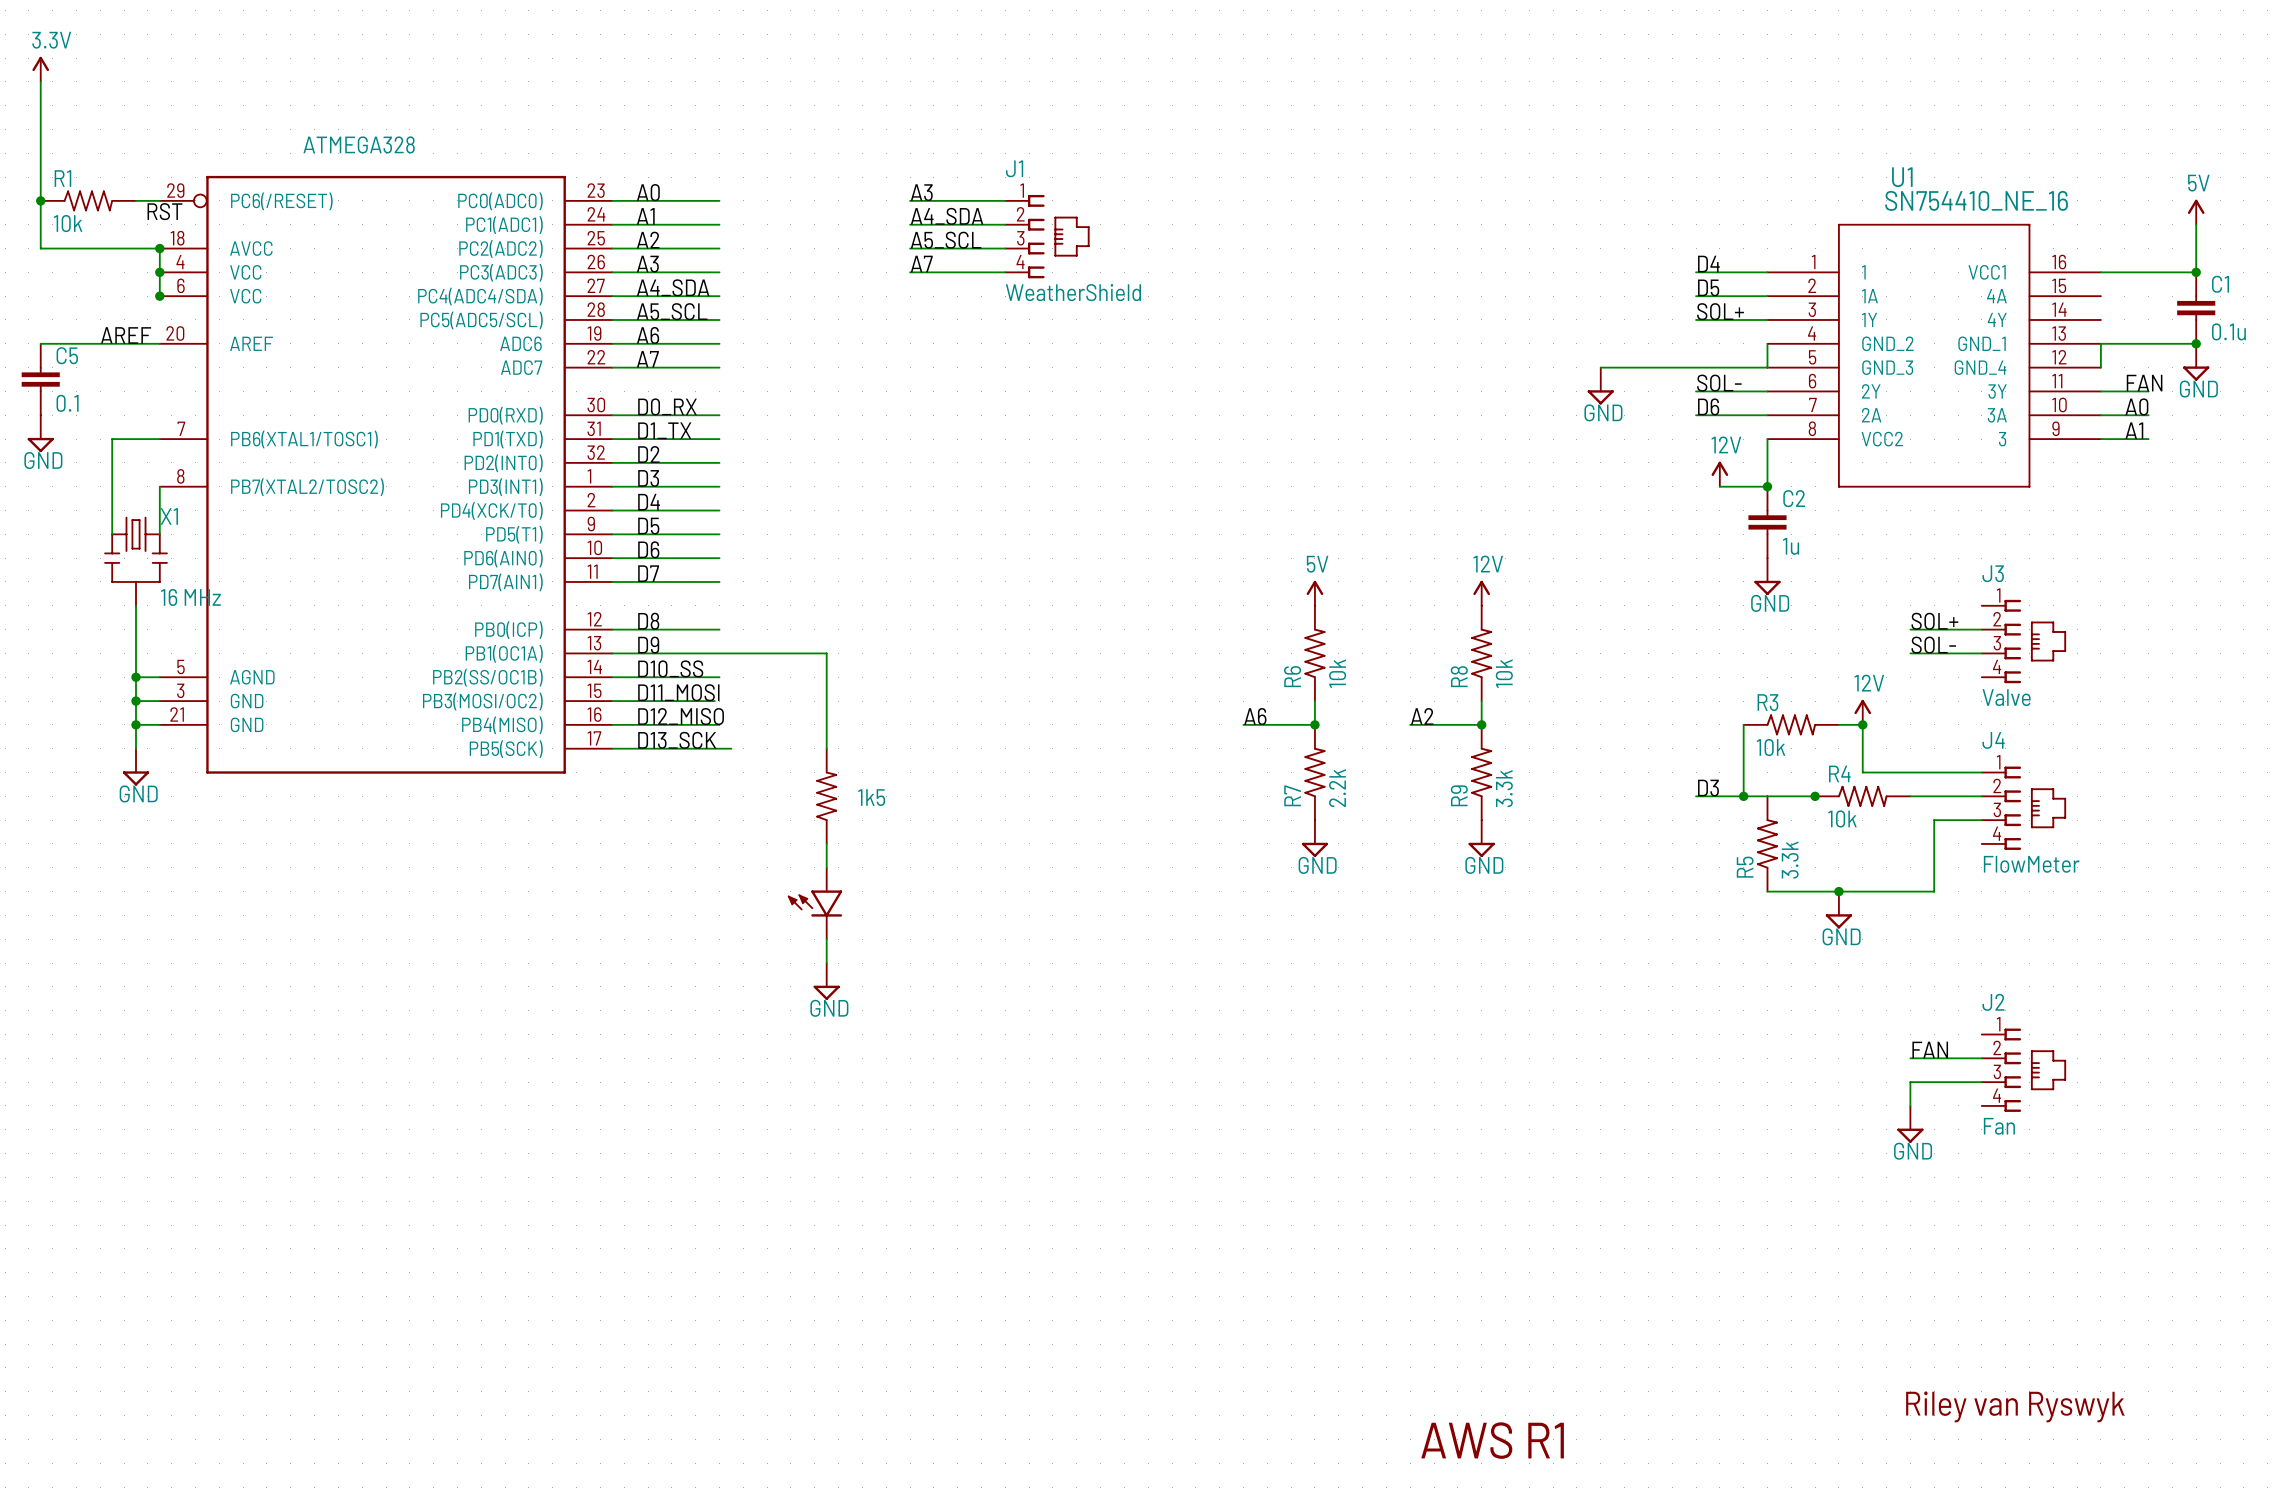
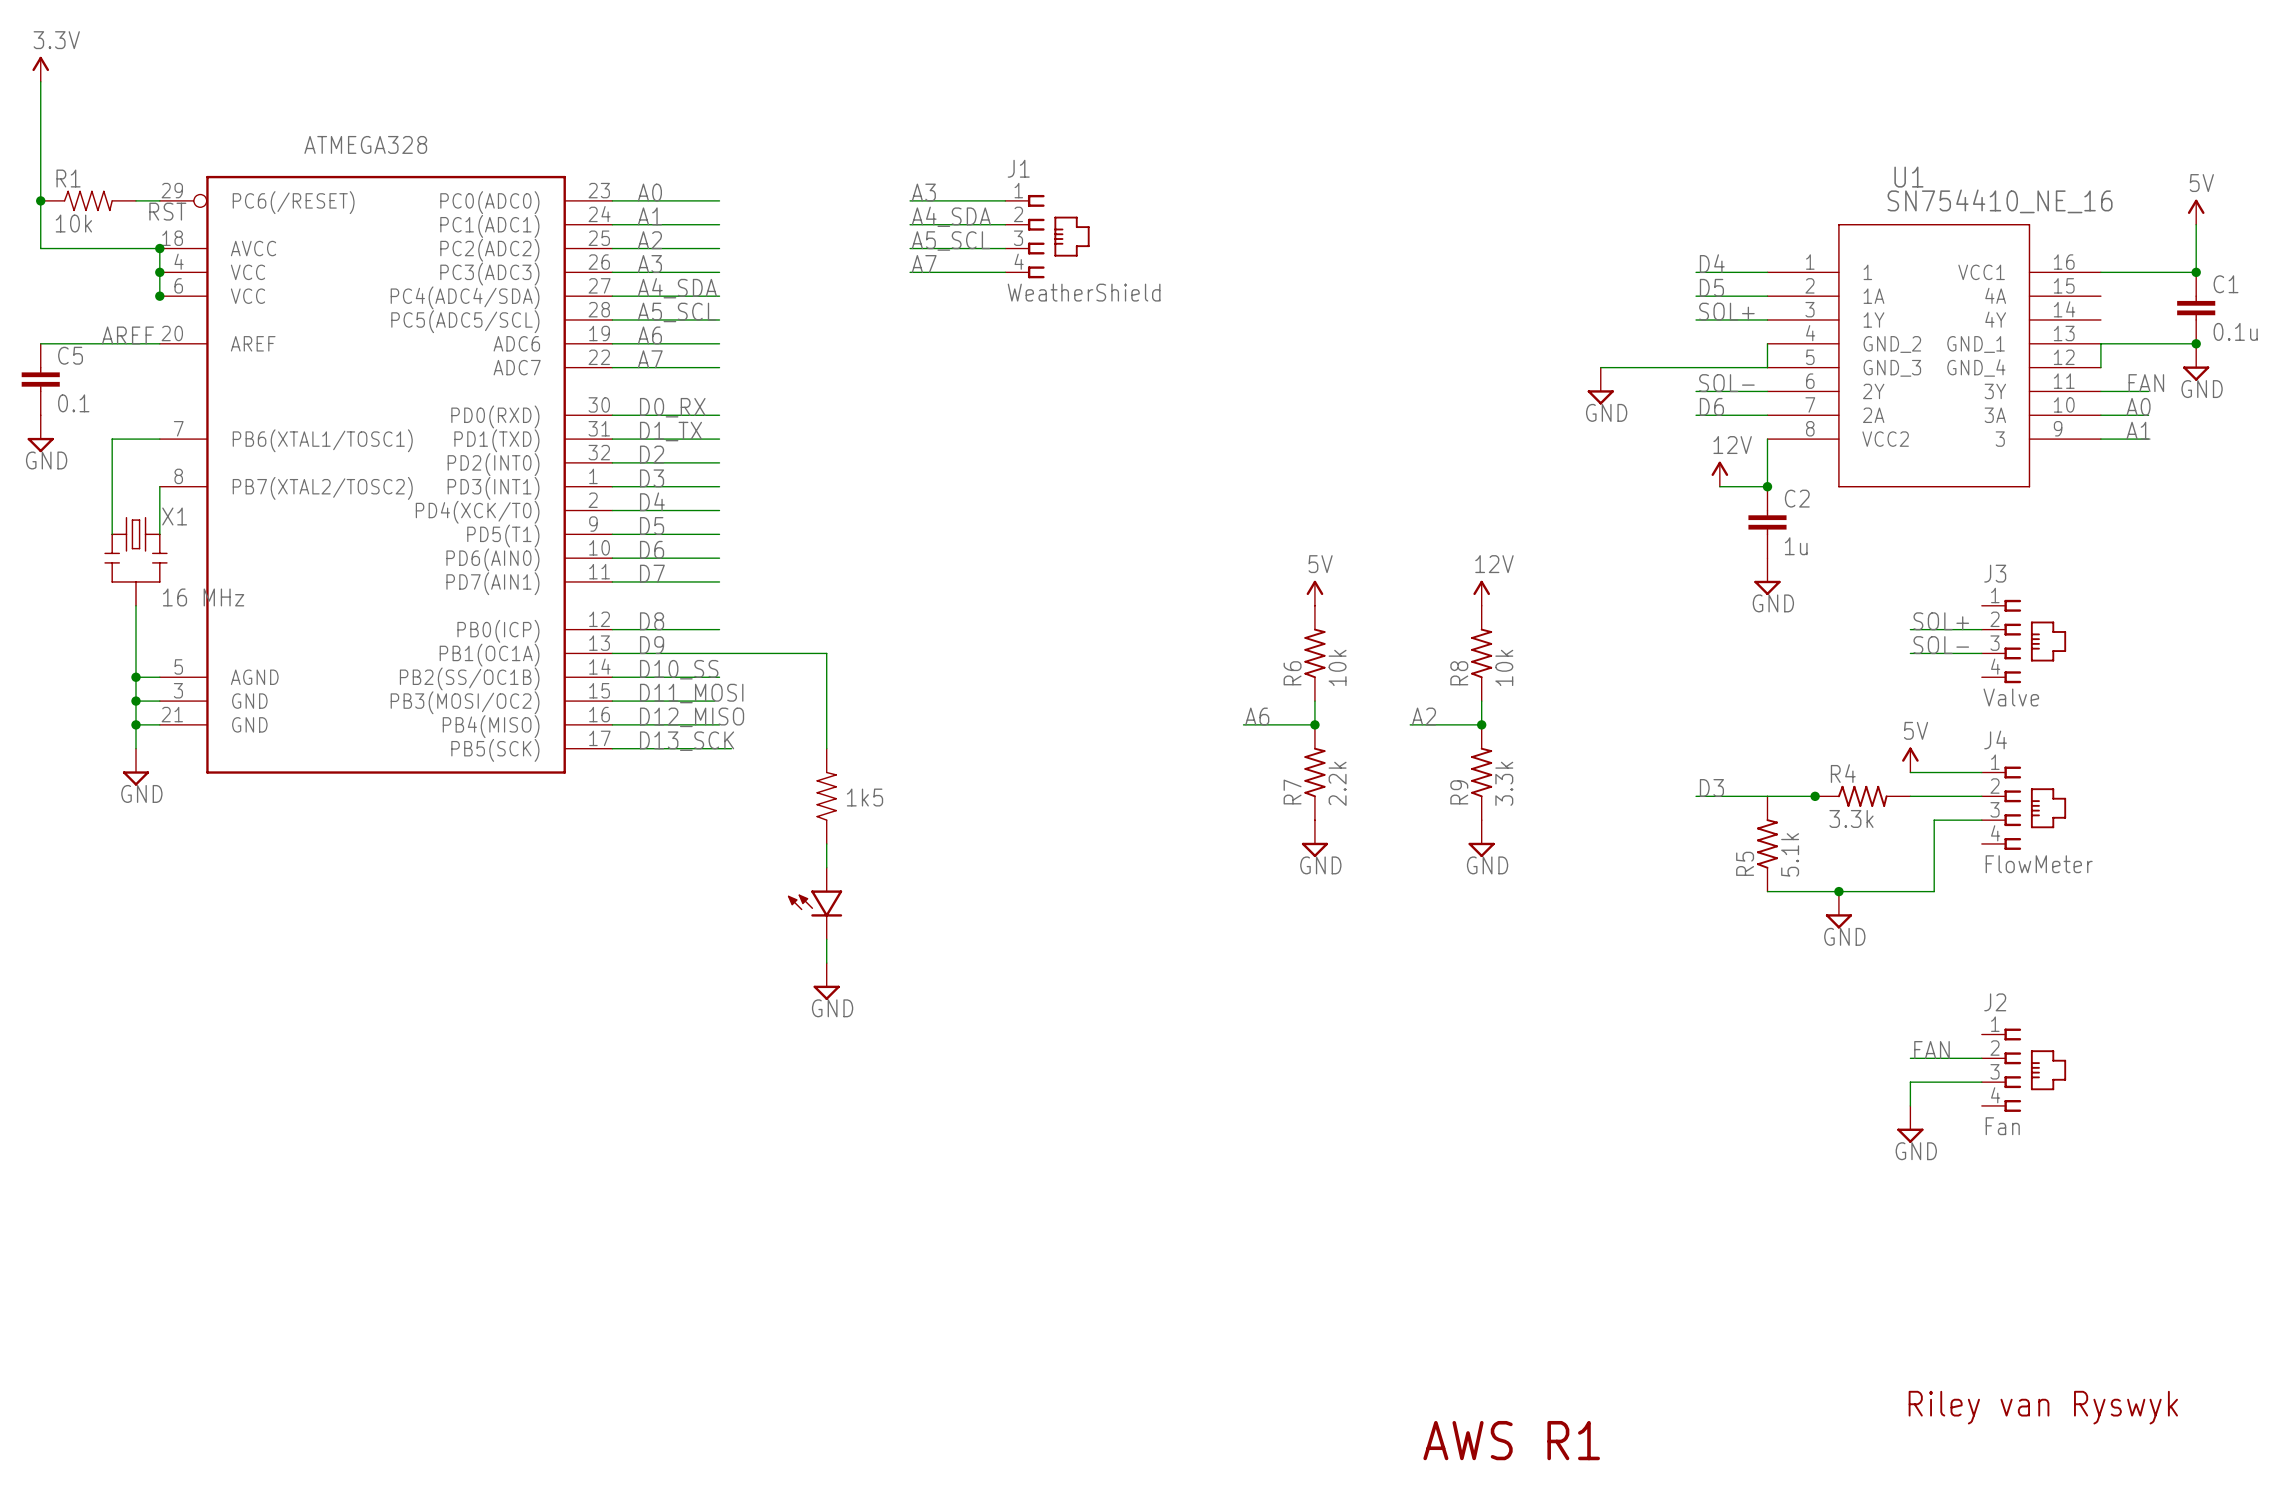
power symbol: 12V (1862, 712) -> none
wire: (1743, 724) (1743, 796) -> none
R3: 10k (1791, 724) -> none
wire: (1838, 724) (1862, 724) (1862, 772) (1910, 772) -> none
junction: (1862, 724) -> none
power symbol: none -> 5V (1910, 760)
junction: (1743, 796) -> none
R4 value: 10k (1842, 818) -> 3.3k (1851, 818)
R5 value: 3.3k (1790, 860) -> 5.1k (1790, 854)

